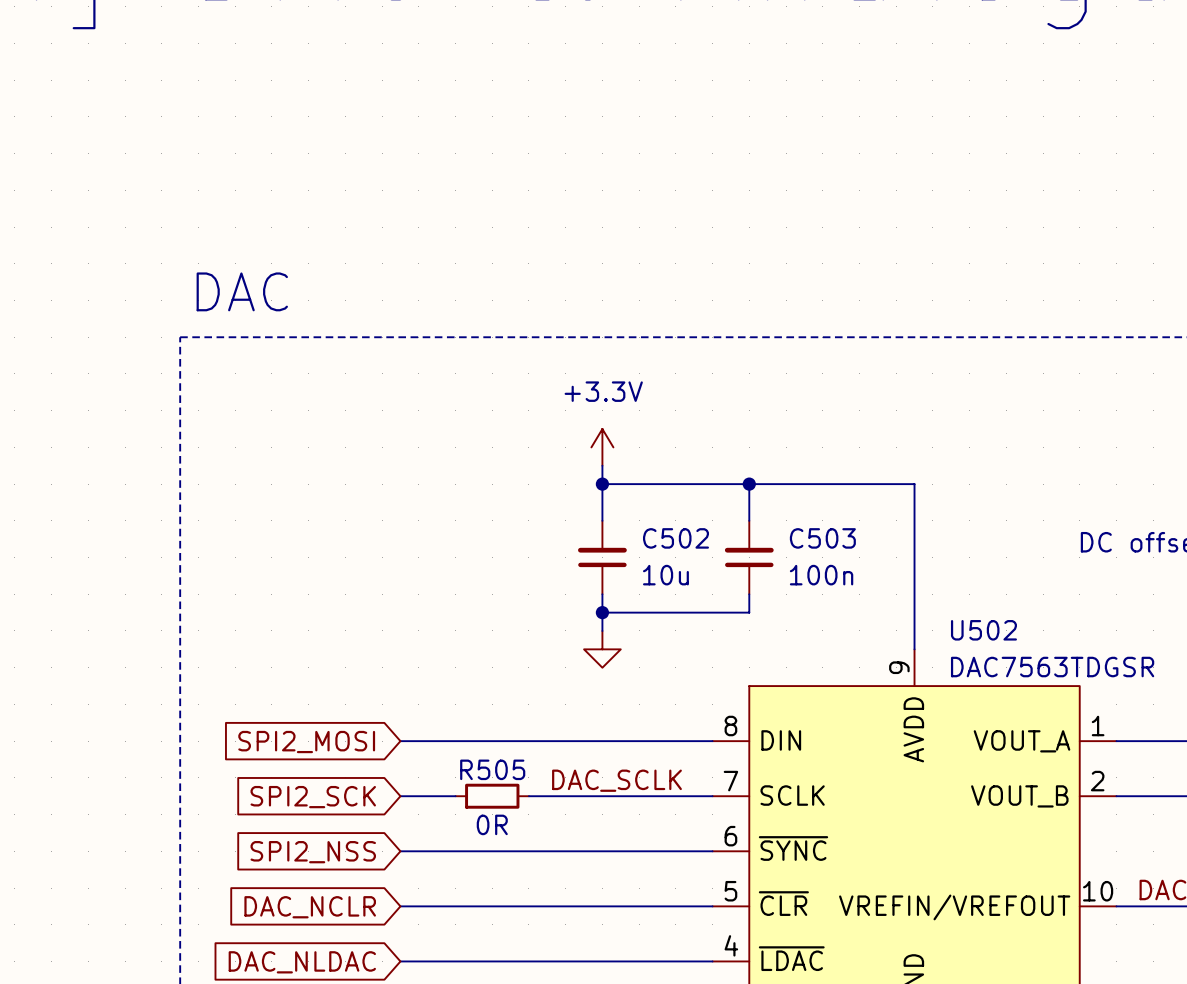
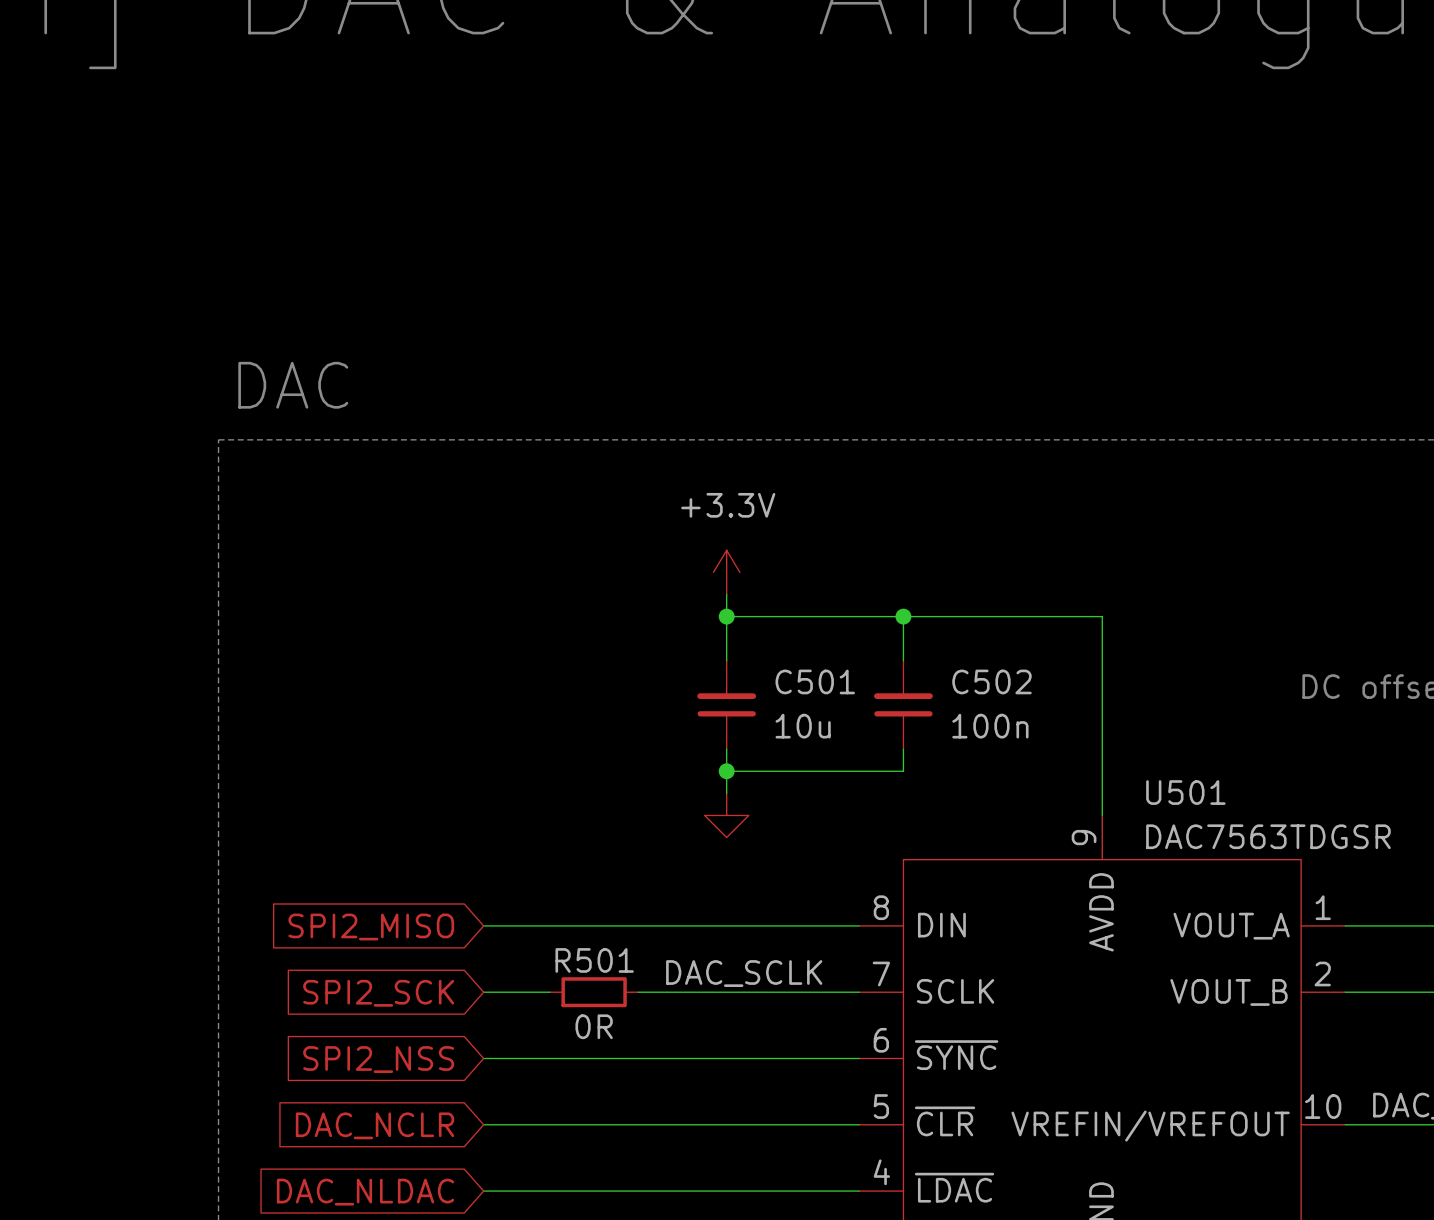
C502 name: C502 (675, 538) -> C501 (815, 681)
C503 name: C503 (822, 538) -> C502 (991, 681)
U502 name: U502 (983, 630) -> U501 (1185, 792)
global label: SPI2_MOSI (306, 742) -> SPI2_MISO (371, 926)
R505 name: R505 (492, 769) -> R501 (594, 960)

